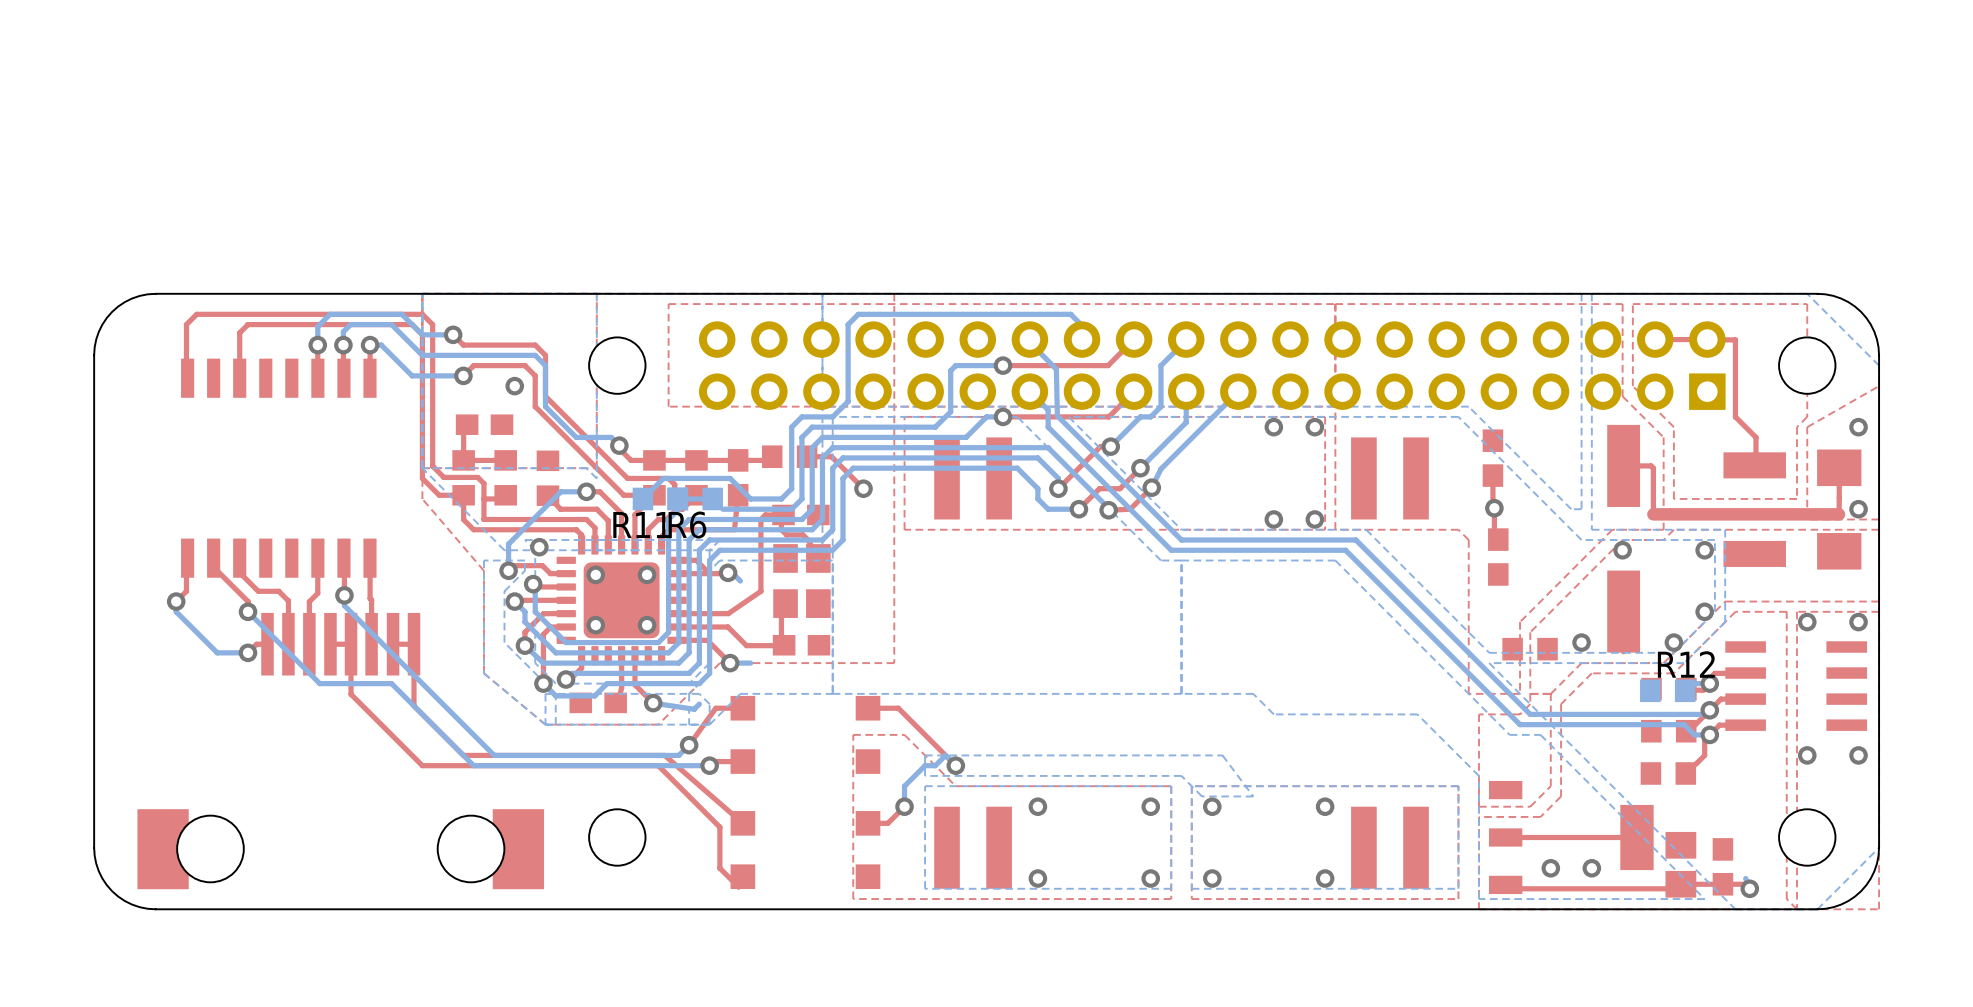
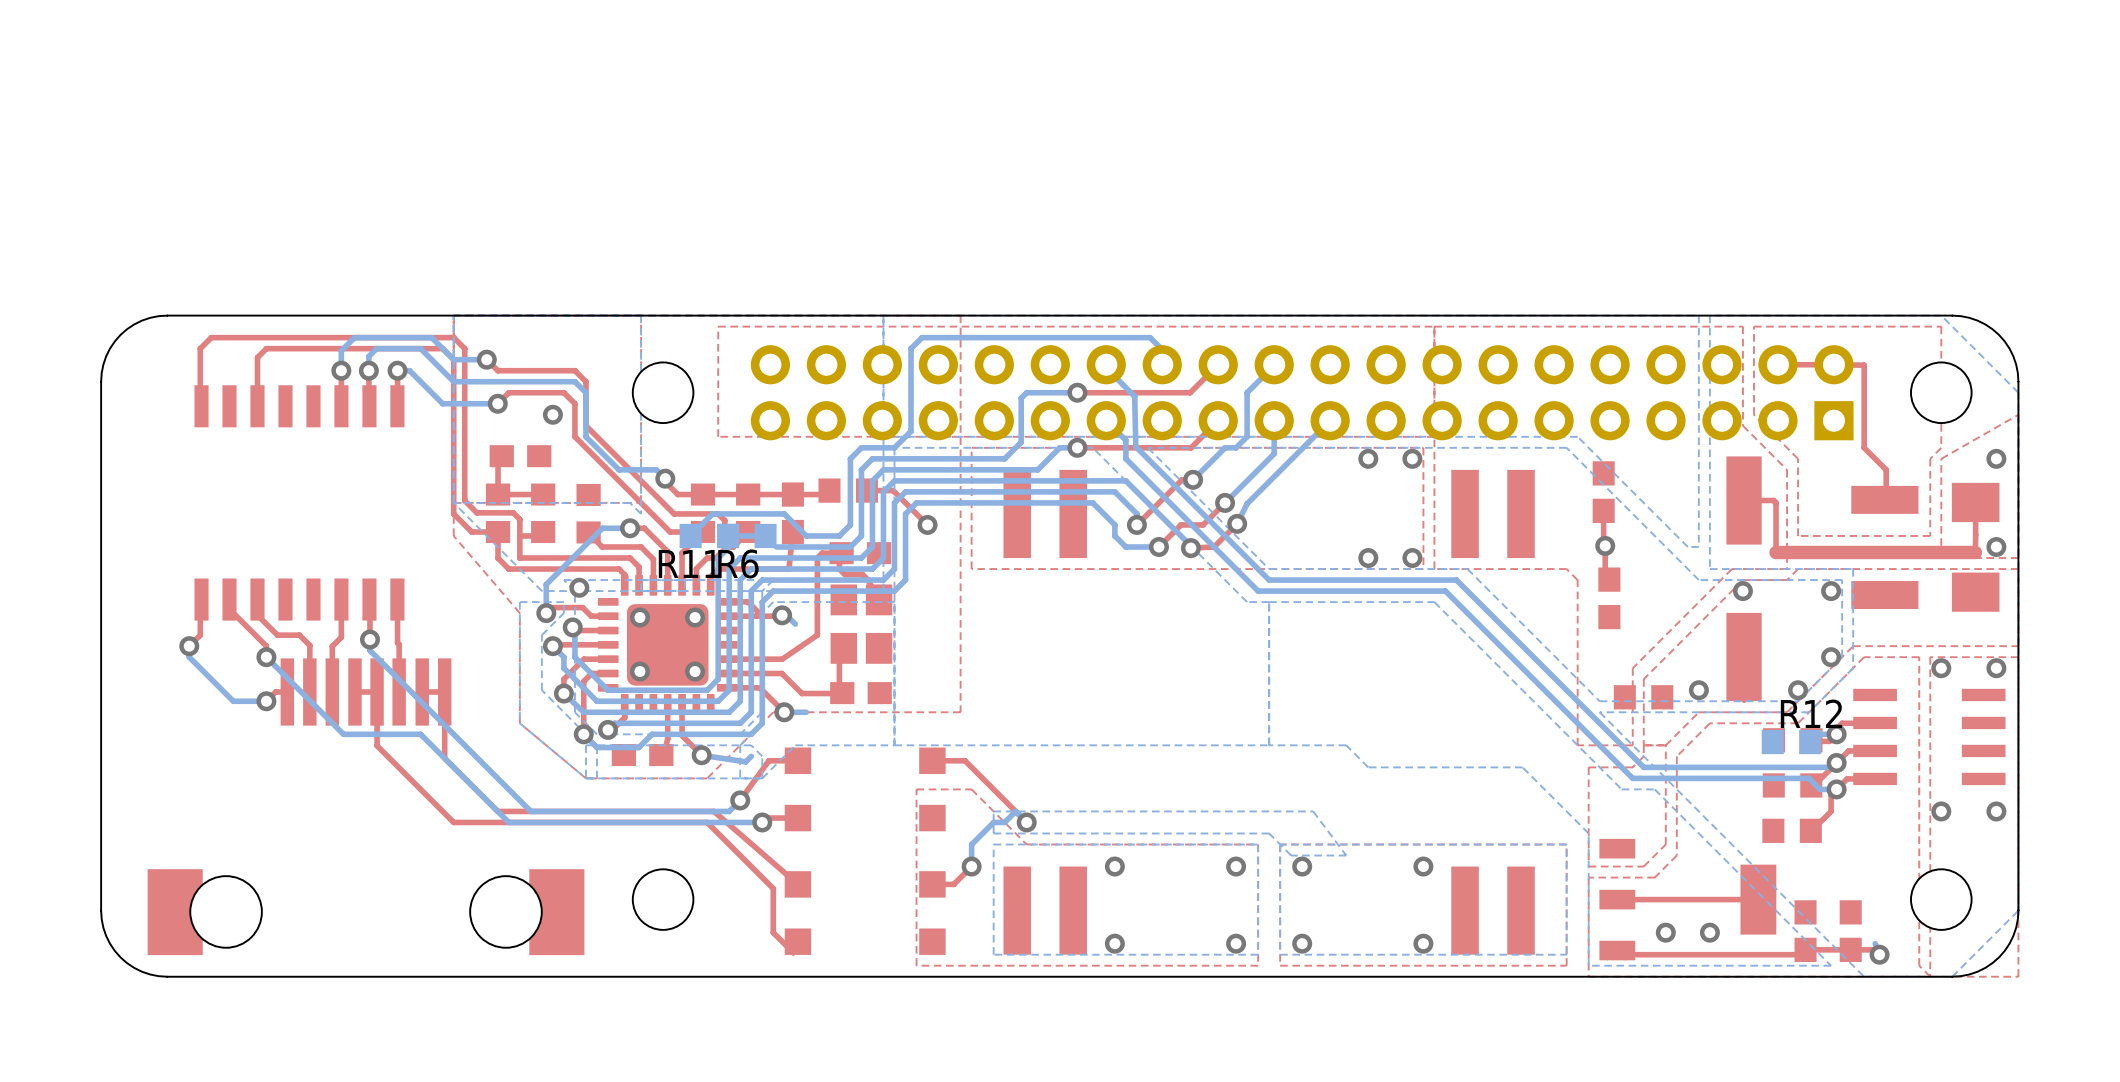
part footprint: [1665, 831, 1697, 898] -> [1794, 900, 1817, 962]

